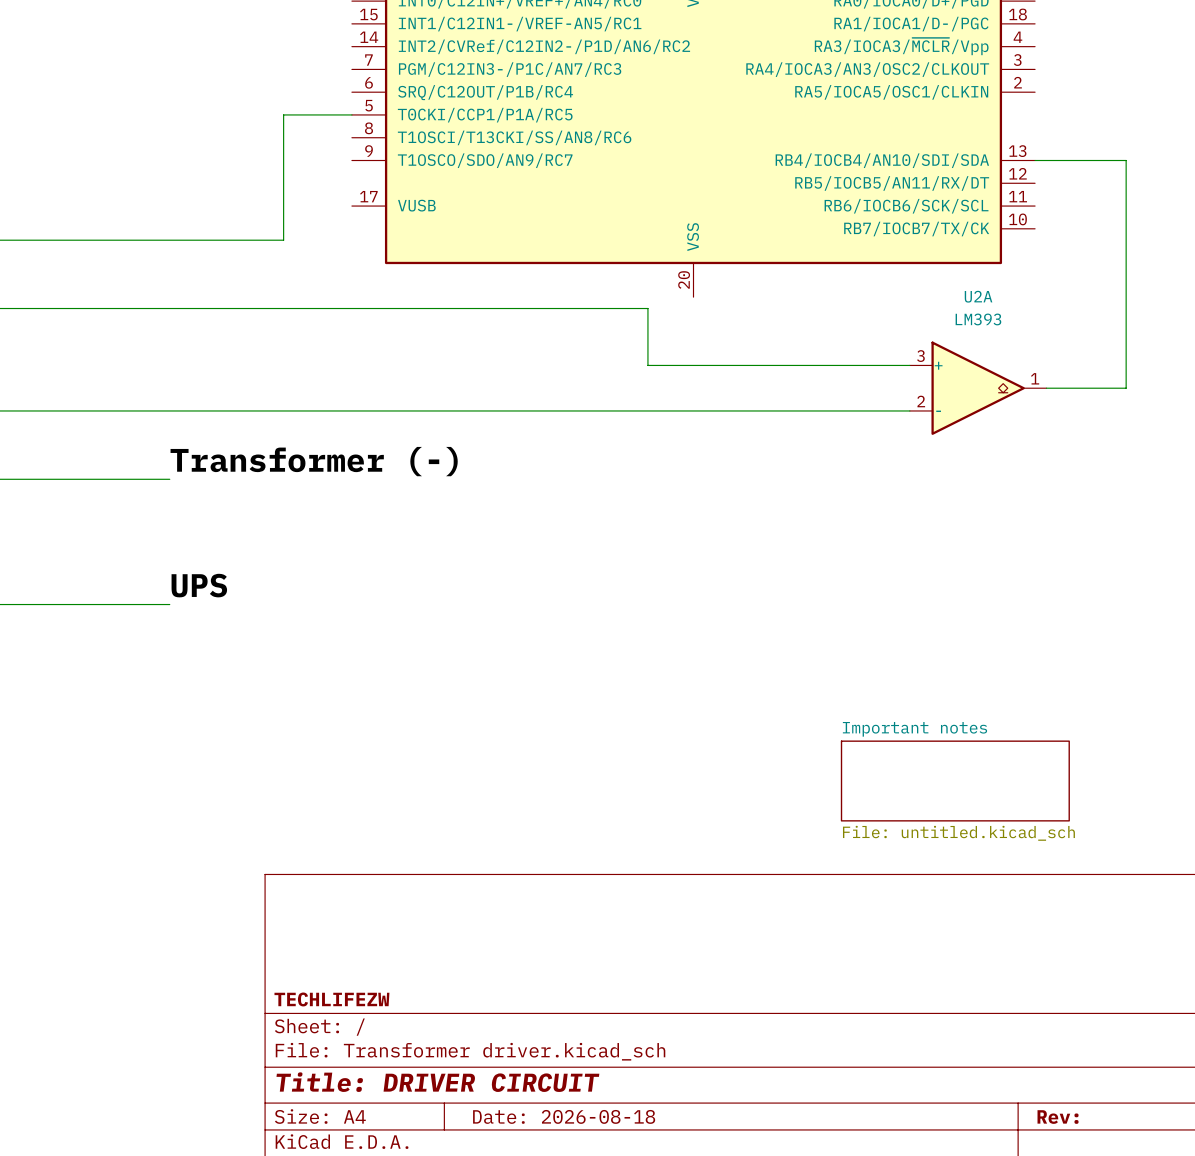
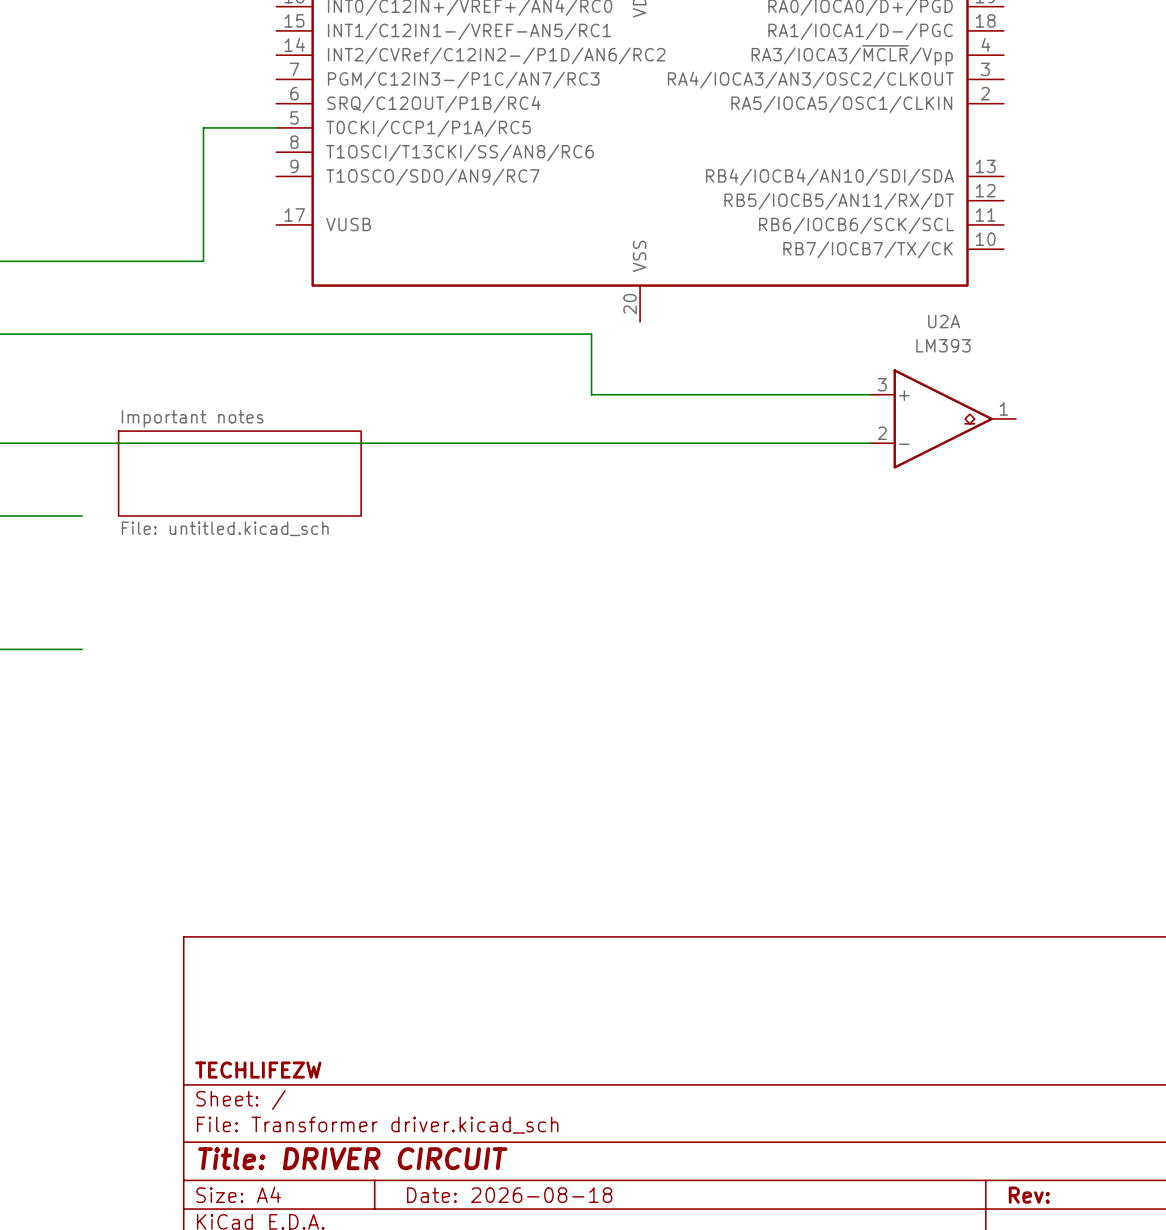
wire: (1035, 160) (1126, 160) (1126, 388) (1046, 388) -> none
sheet Important notes: none -> File: untitled.kicad_sch (239, 473)
label: Transformer (-) (314, 461) -> none
label: UPS (199, 585) -> none
sheet Important notes: File: untitled.kicad_sch (955, 781) -> none

